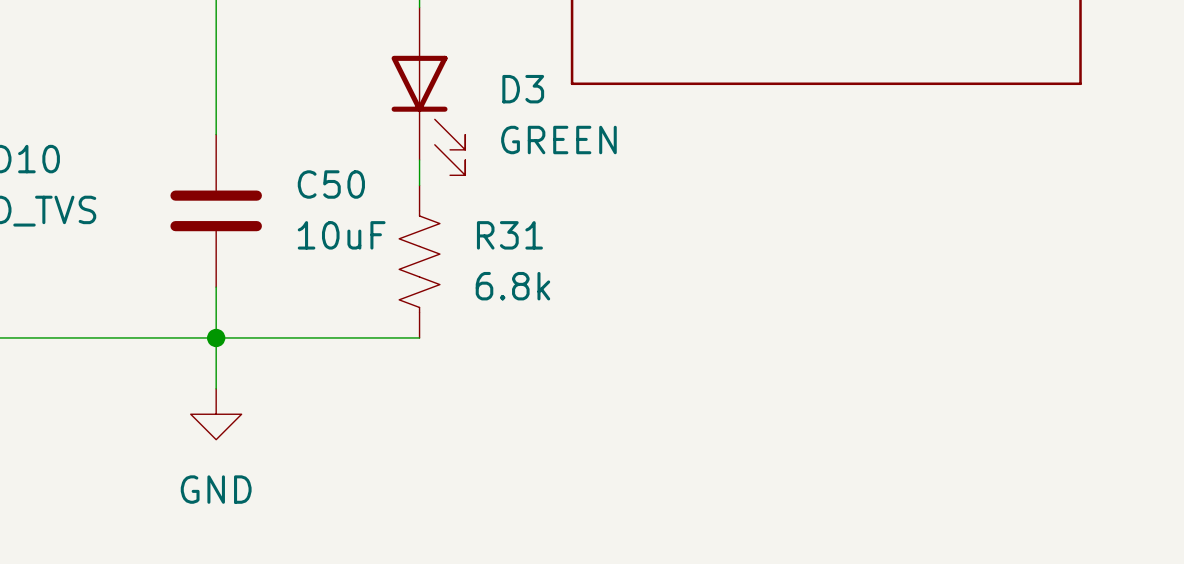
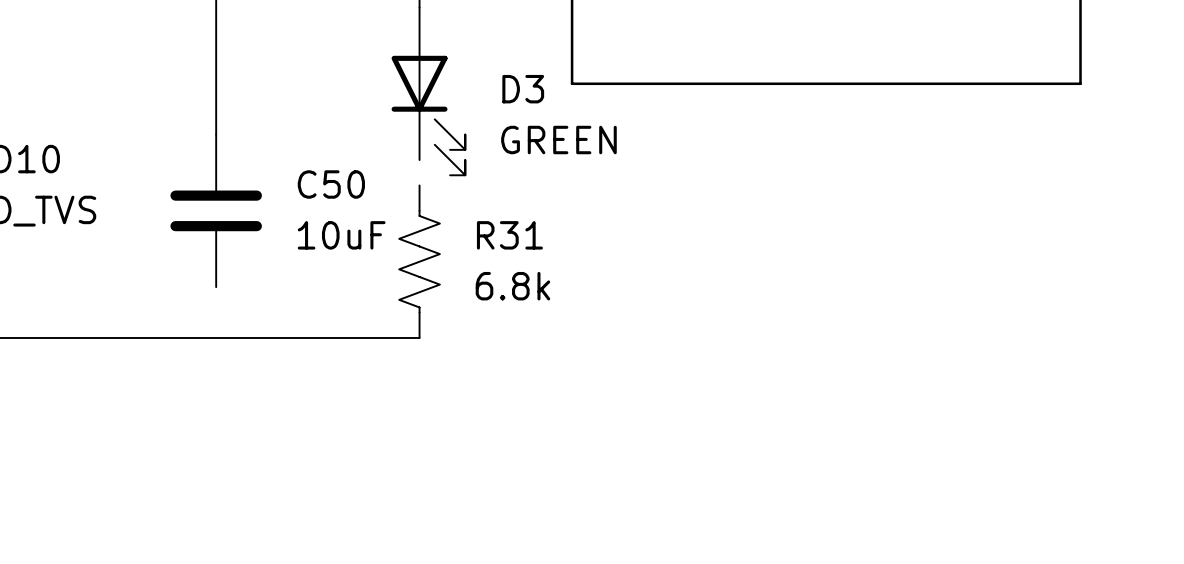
wire: (419, 160) (419, 185) -> none
wire: (216, 287) (216, 388) -> none
junction: (216, 337) -> none
power symbol: GND (216, 414) -> none

